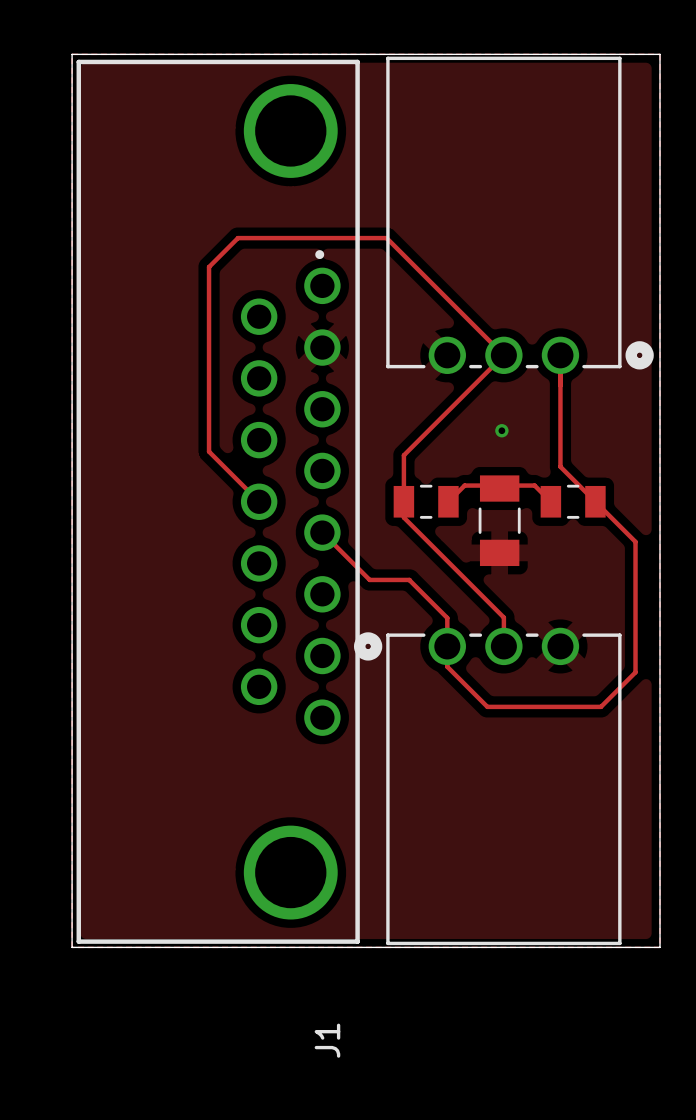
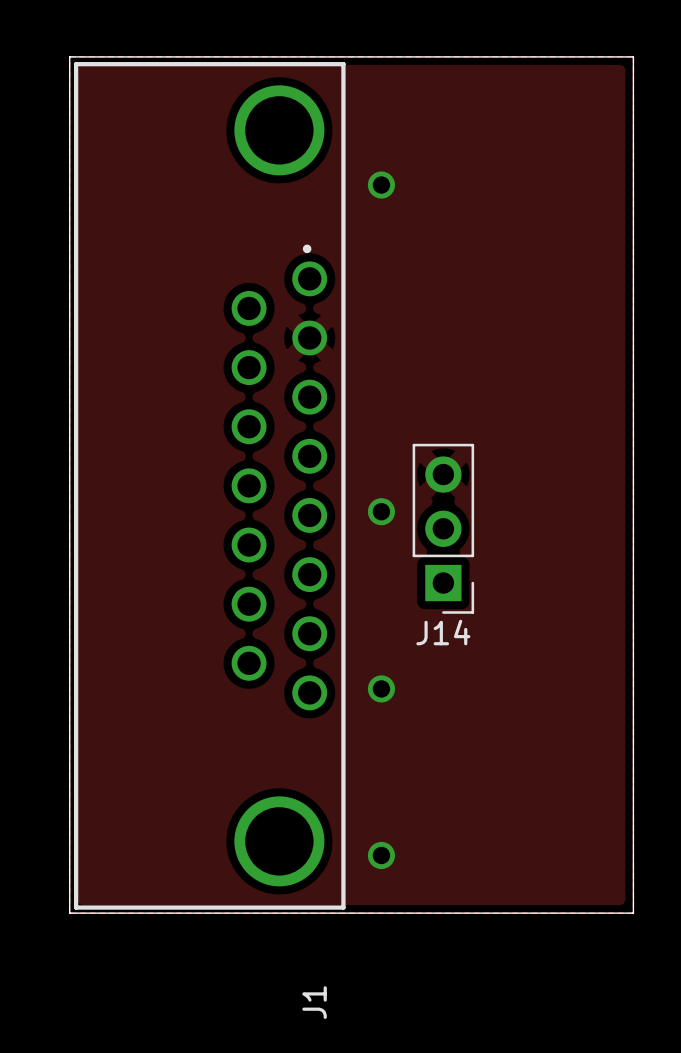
via: none -> (381, 185)
part: (520, 215) -> none
track: (560, 355) (560, 466) (635, 541) (635, 672) (600, 706) (487, 706) (447, 666) (447, 617) (409, 580) -> none
via: (501, 430) -> none
track: (259, 501) (209, 451) (209, 267) (237, 238) (386, 238) (503, 355) (403, 455) (403, 517) (503, 617) (503, 646) -> none
part: (426, 501) -> none
track: (448, 501) (464, 485) (534, 485) (550, 501) -> none
part: (573, 501) -> none
part: (499, 520) -> none
via: none -> (381, 511)
track: (322, 532) (369, 579) (409, 579) -> none
J14: none -> (443, 528)
via: none -> (381, 688)
part: (487, 786) -> none
via: none -> (381, 855)

